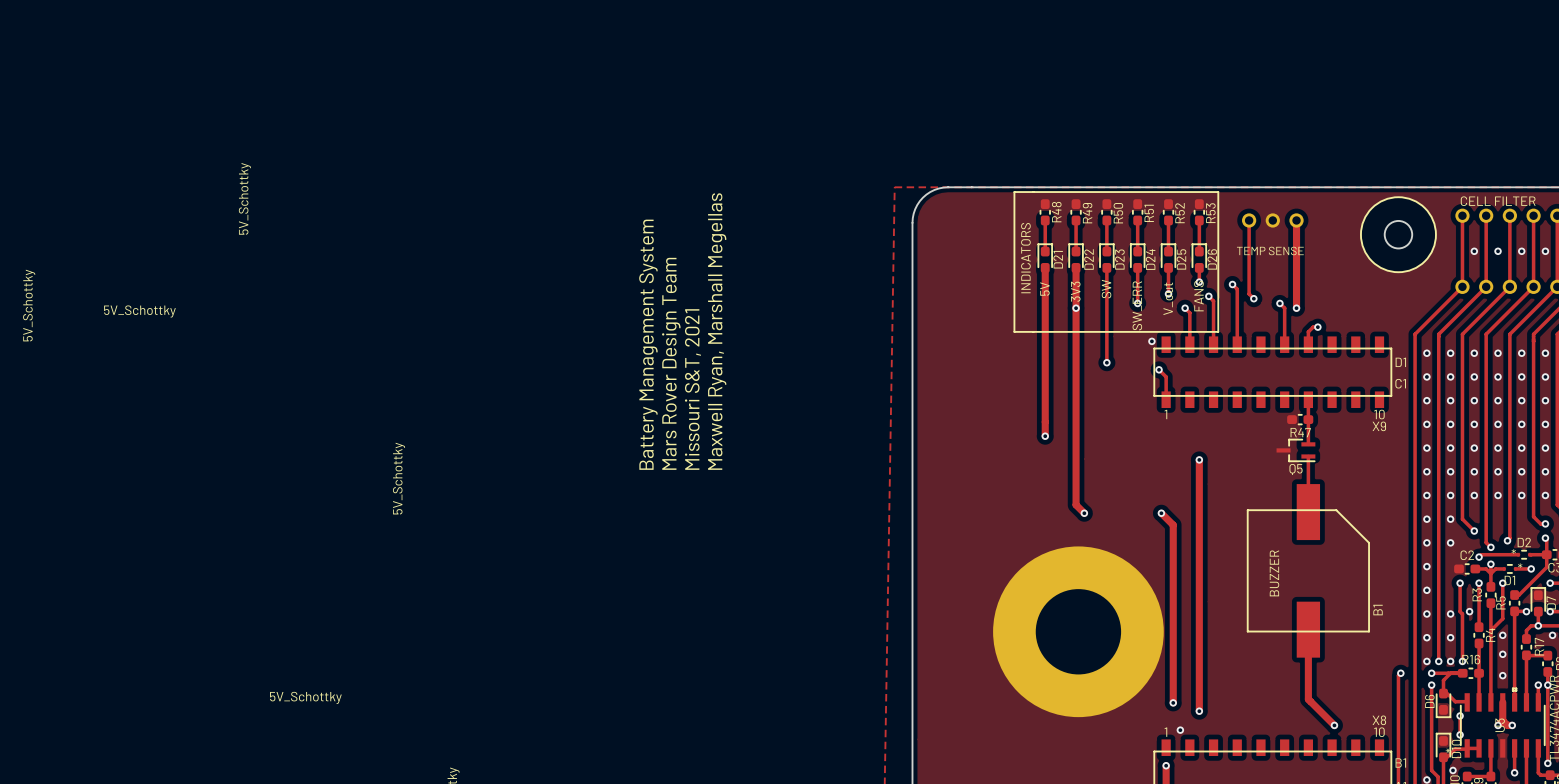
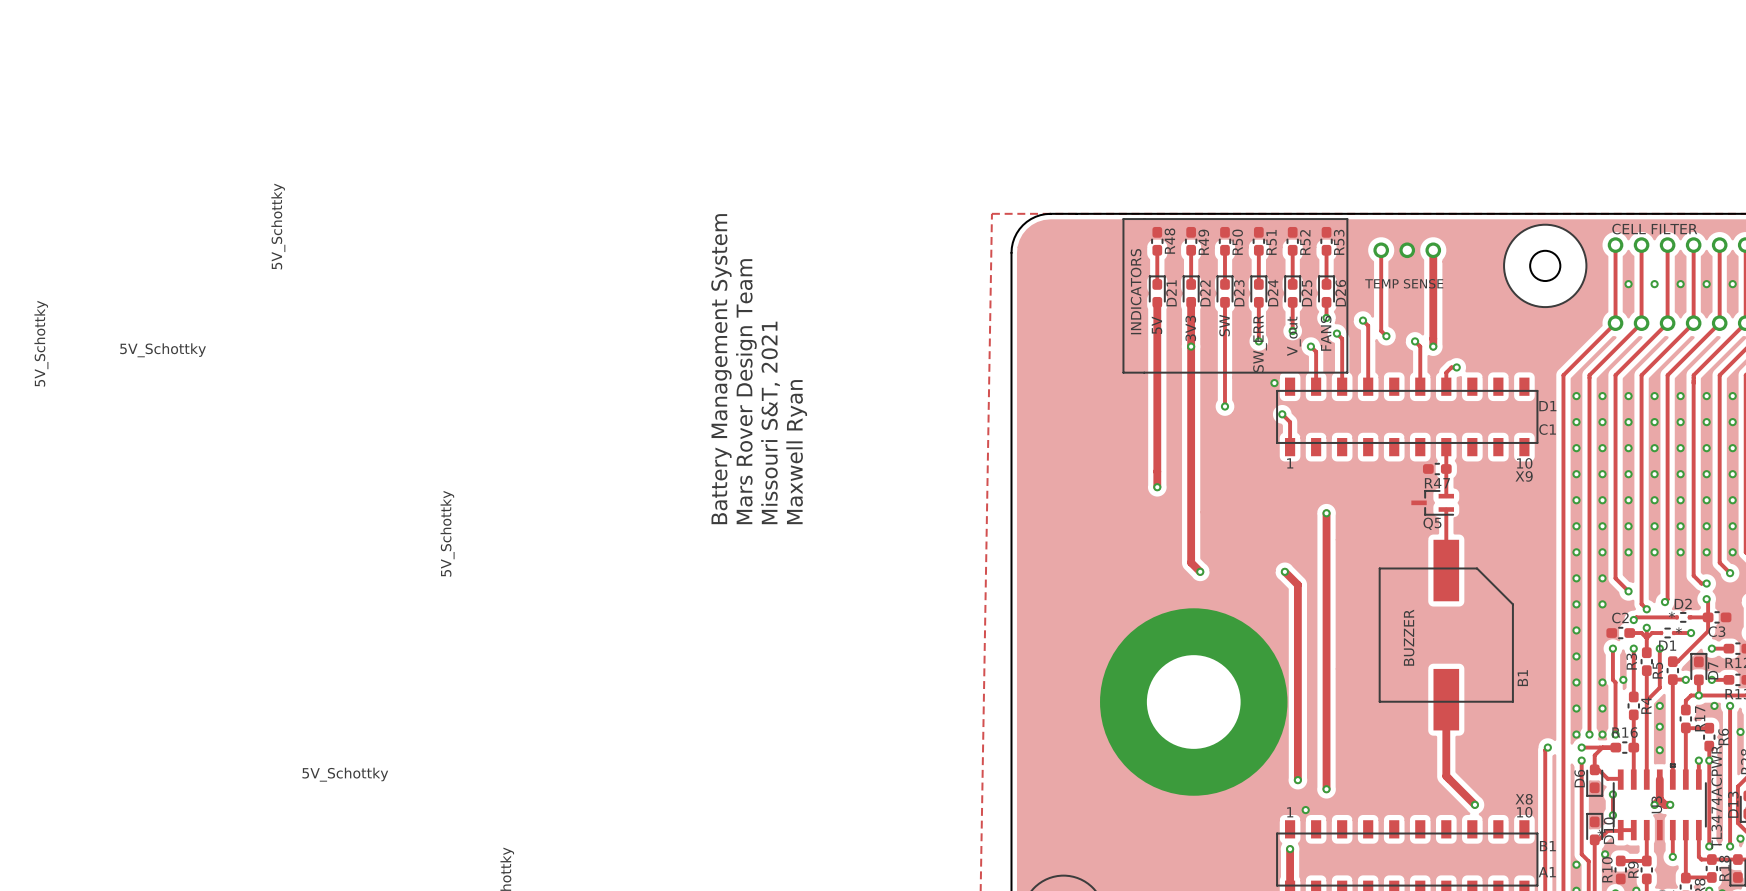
text: Maxwell Ryan, Marshall Megellas (717, 331) -> Maxwell Ryan (796, 452)

